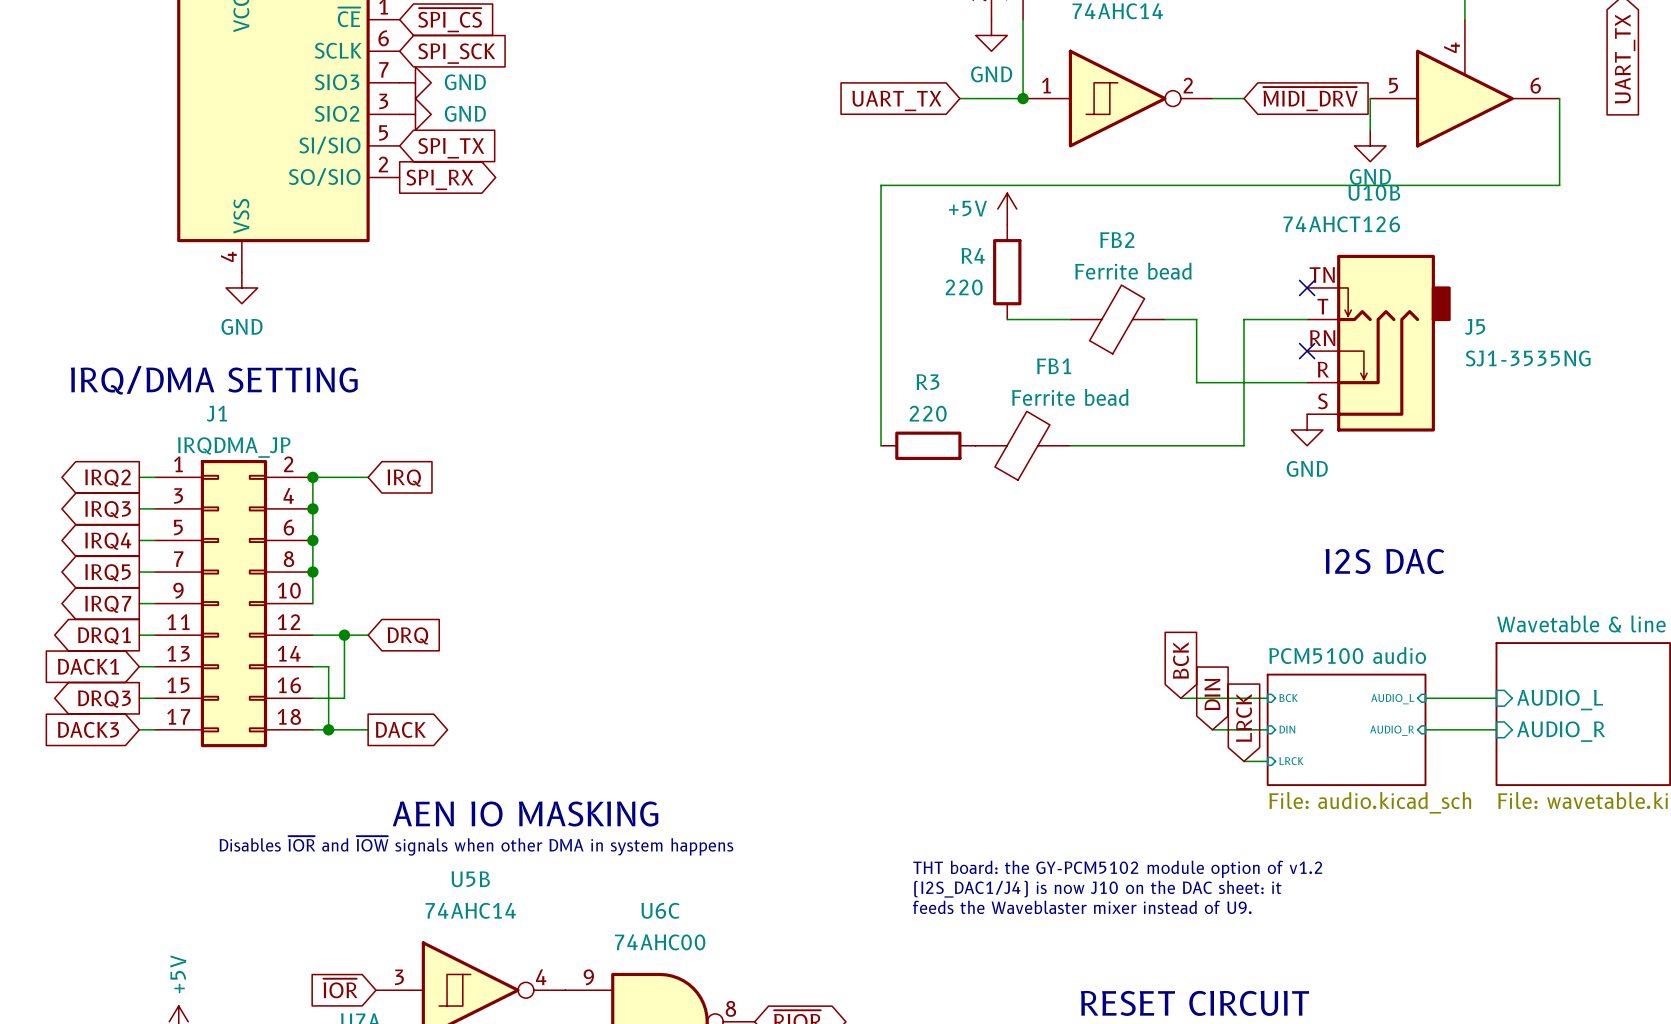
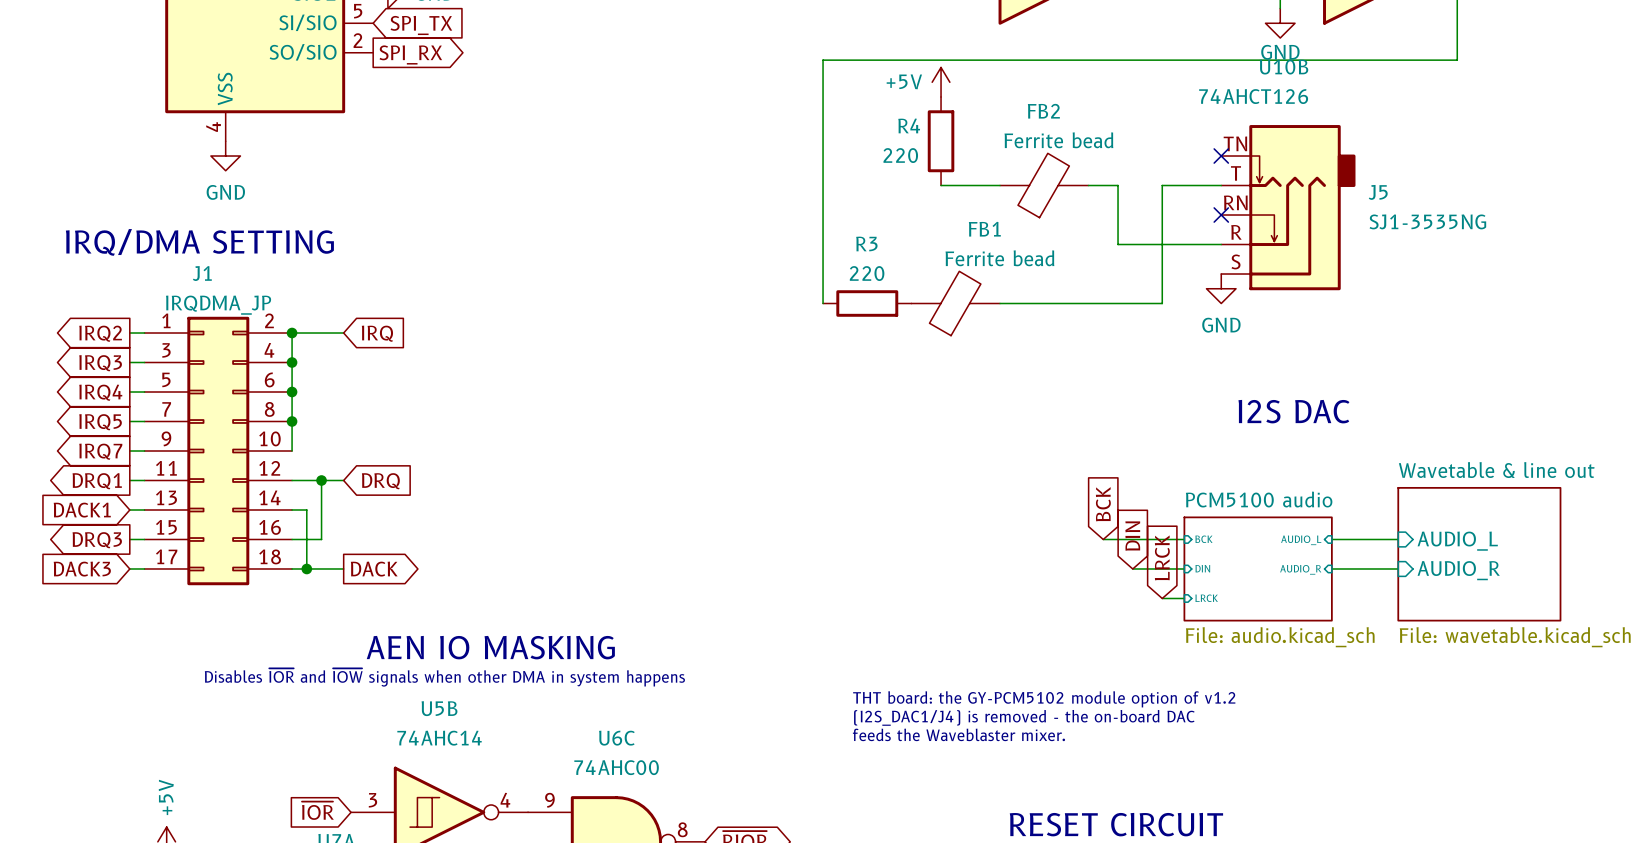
text: (I2S_DAC1/J4) is now J10 on the DAC sheet: it (1097, 889) -> (I2S_DAC1/J4) is removed - the on-board DAC (1024, 717)
text: feeds the Waveblaster mixer instead of U9. (1082, 907) -> feeds the Waveblaster mixer. (958, 734)

